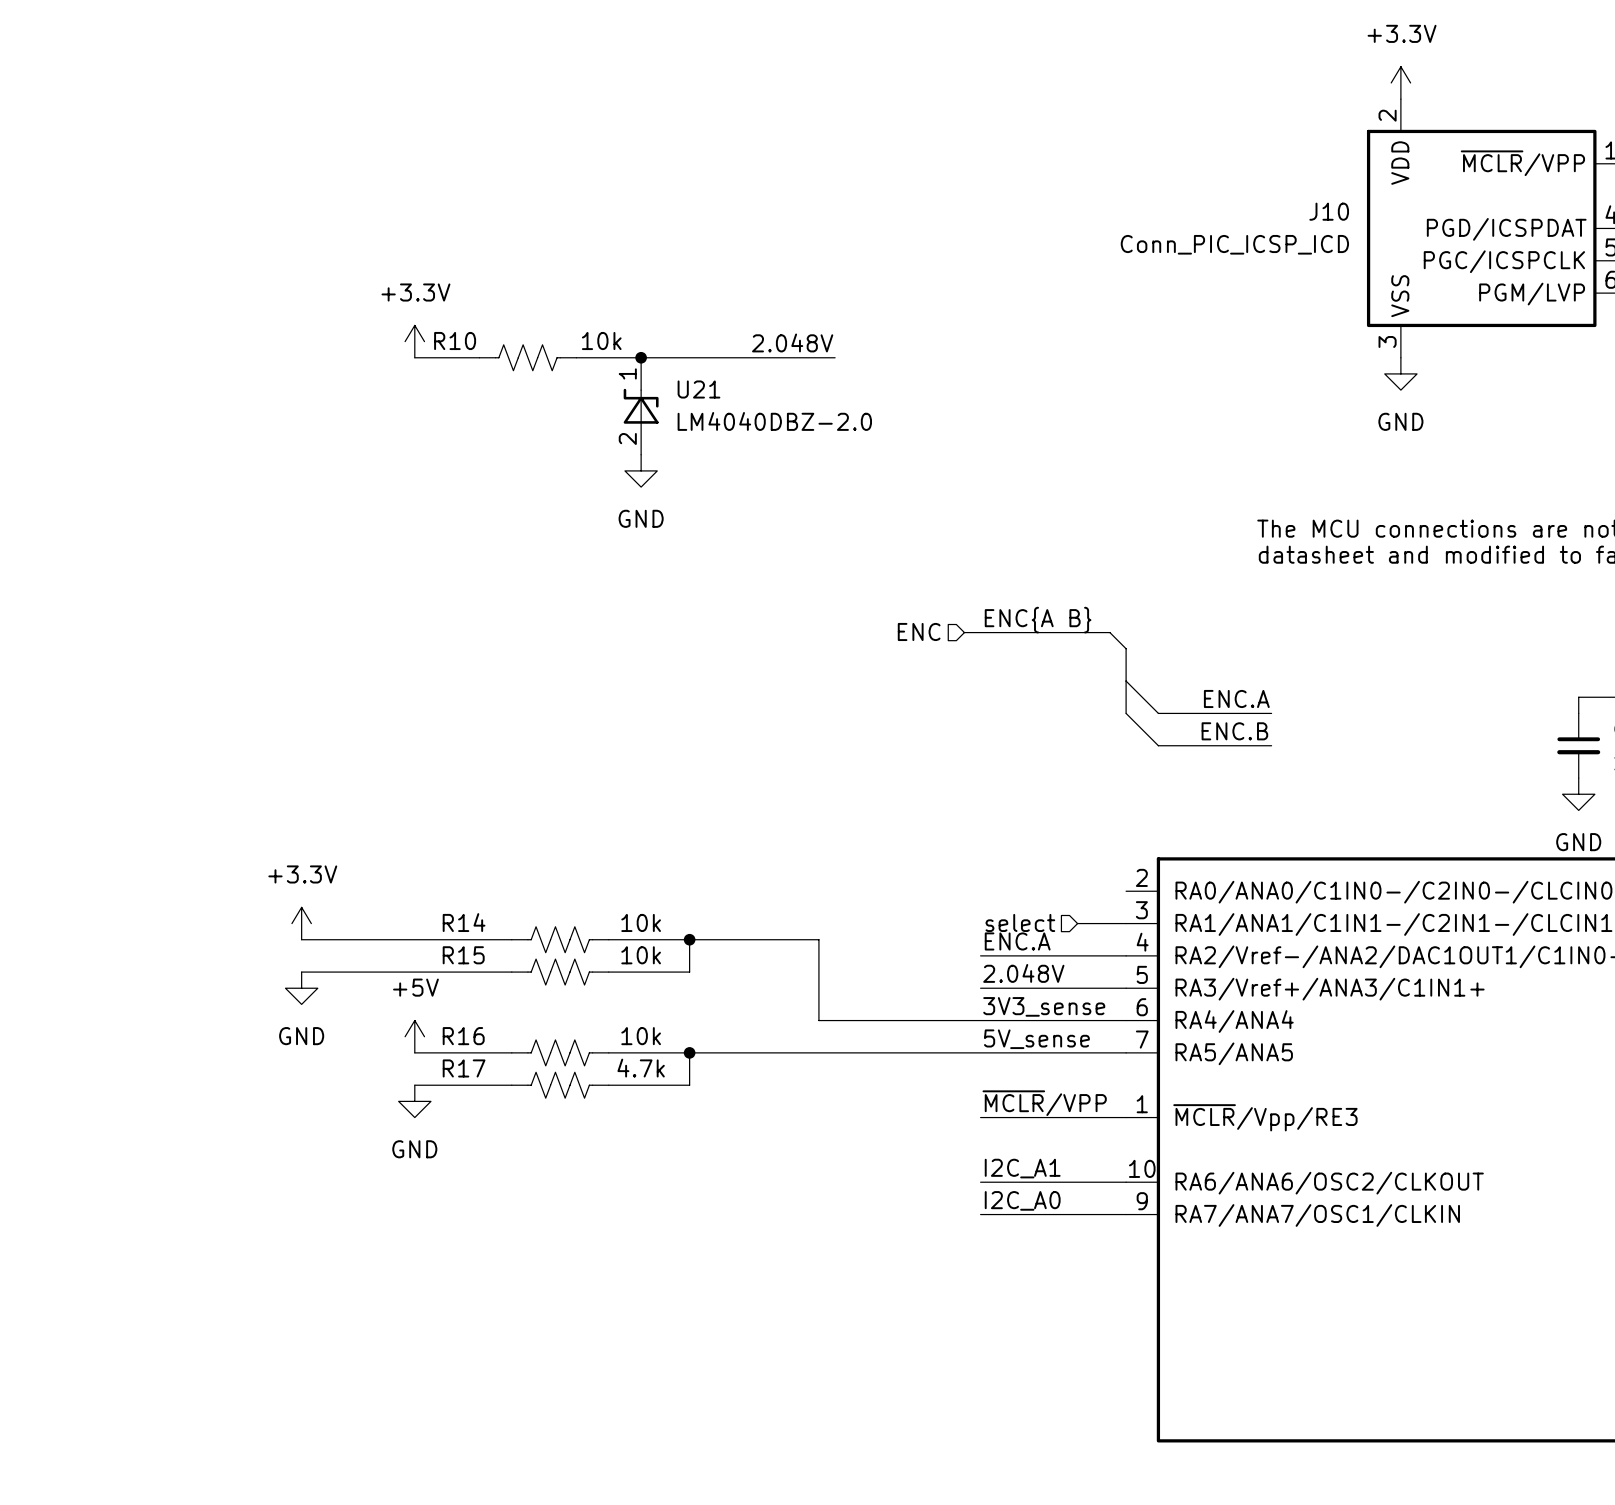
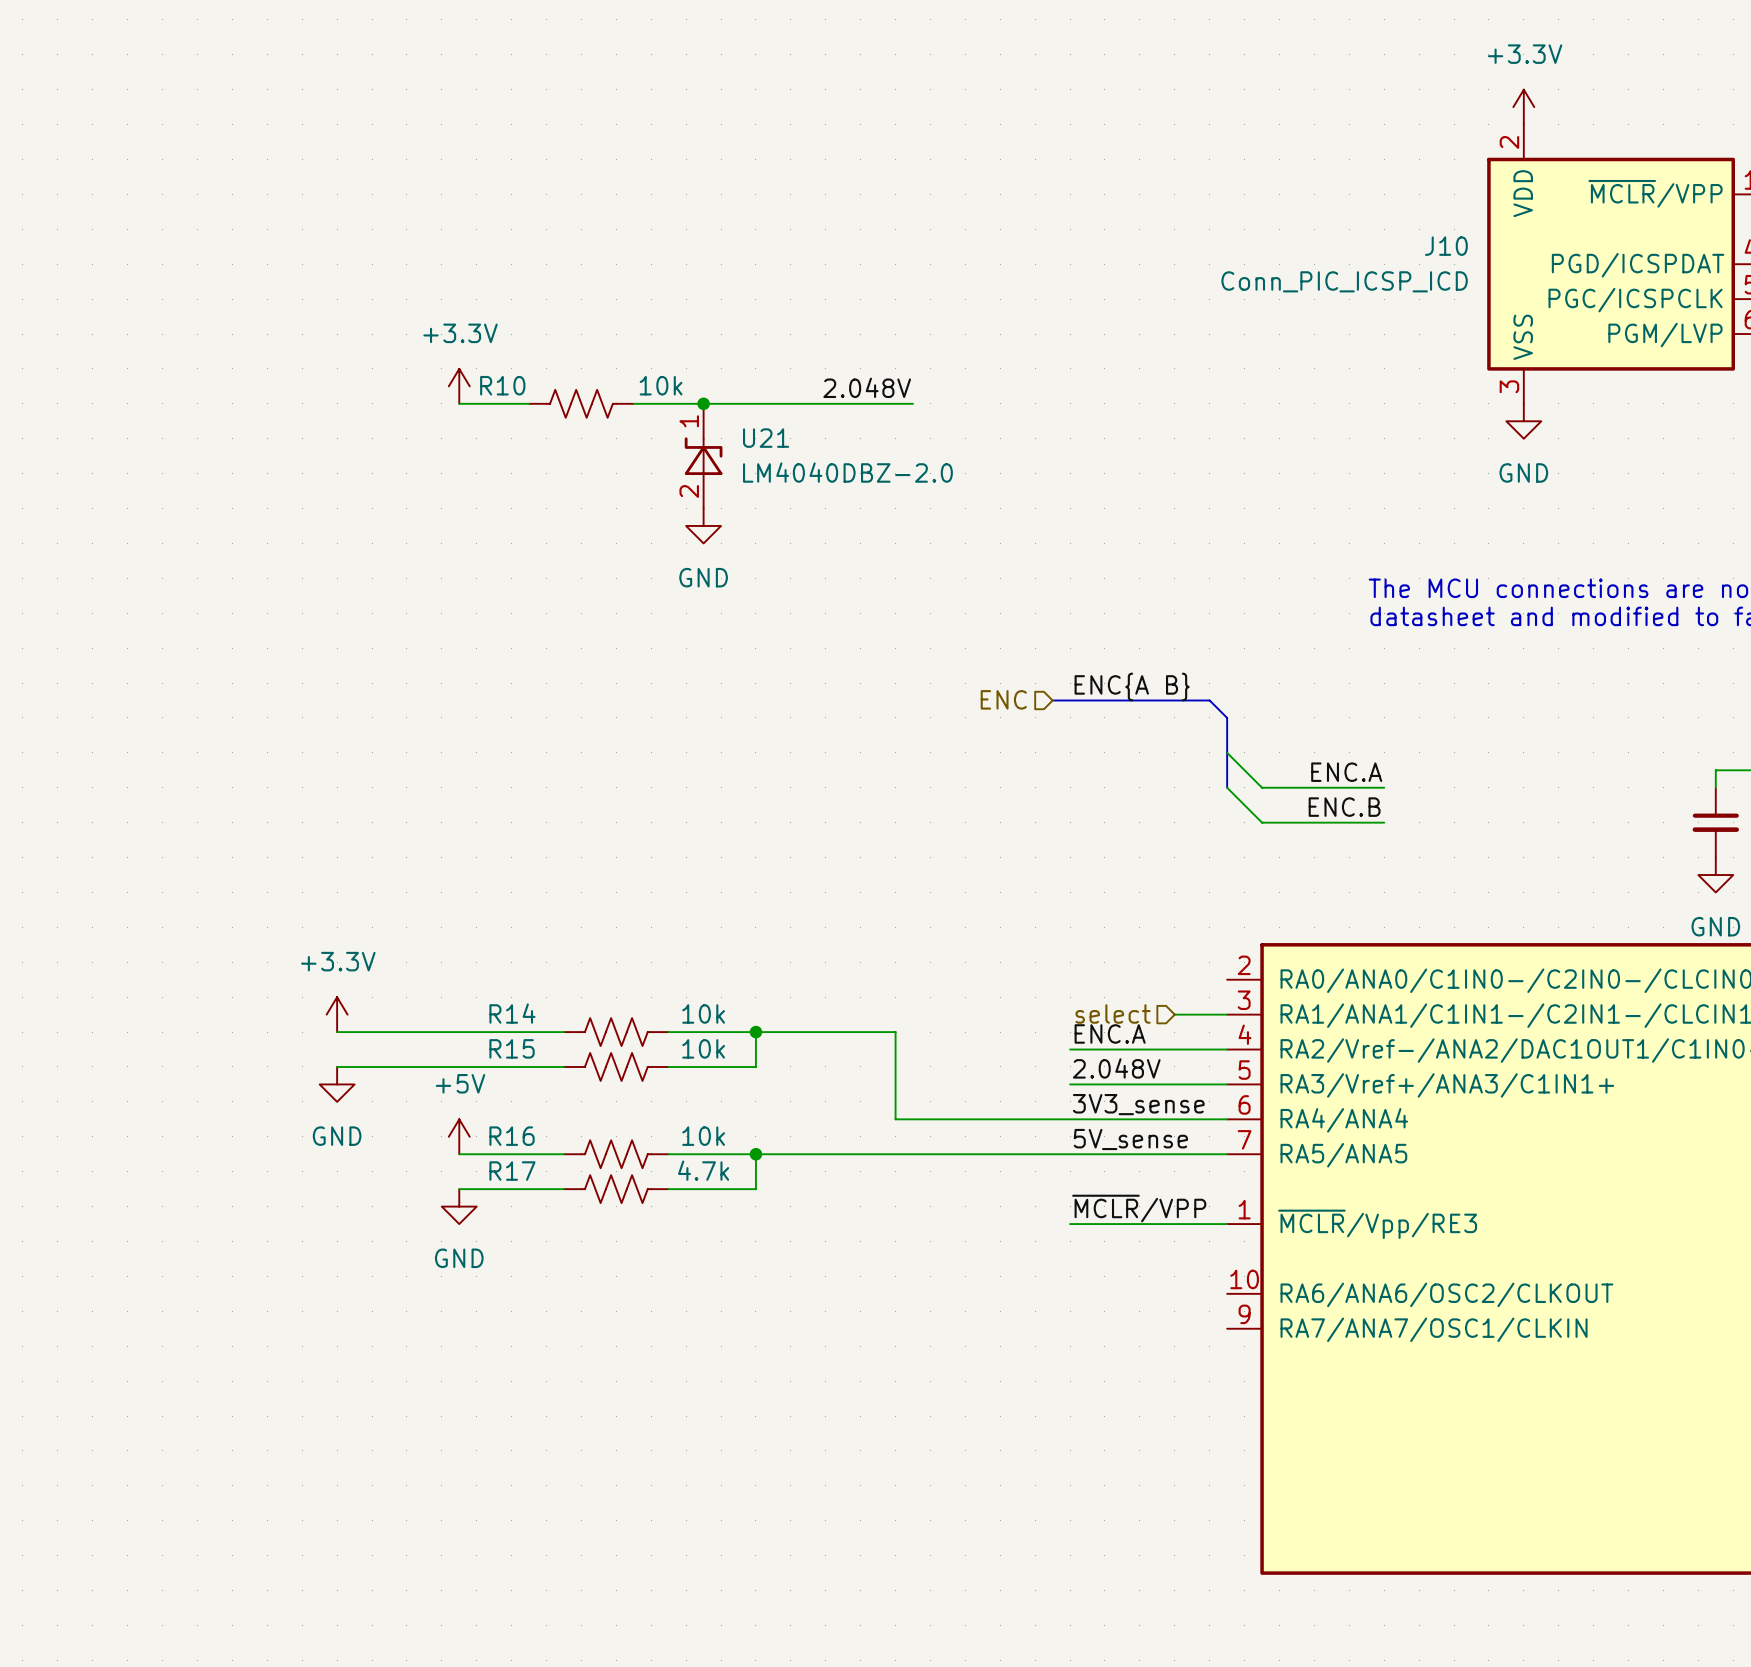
label: I2C_A1 (1022, 1168) -> none
wire: (980, 1182) (1126, 1182) -> none
label: I2C_A0 (1022, 1200) -> none
wire: (980, 1214) (1126, 1214) -> none

